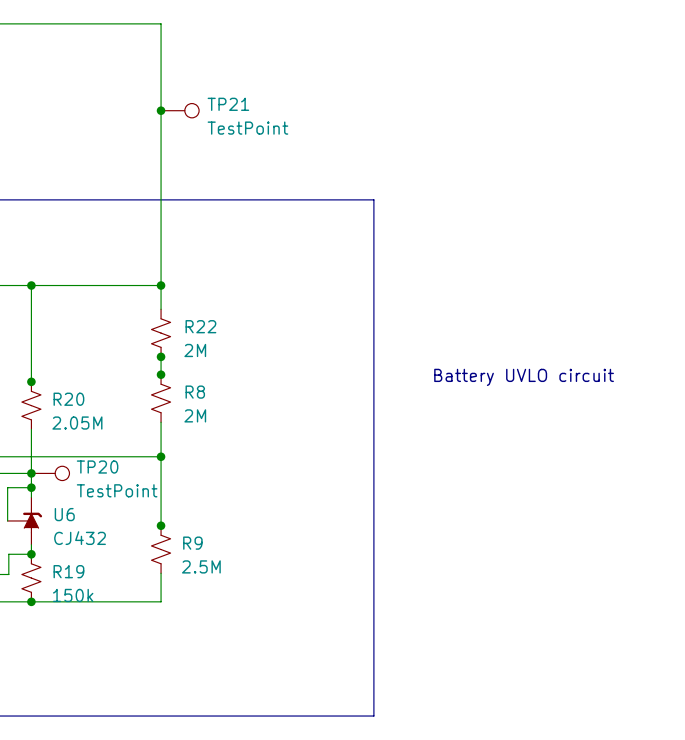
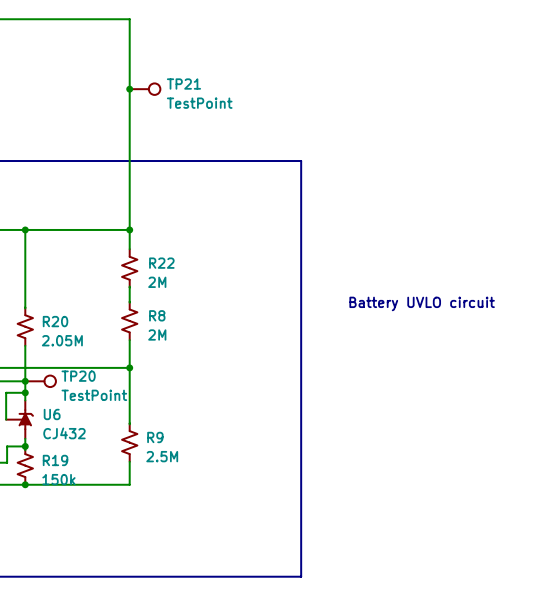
junction: (161, 356) -> none
junction: (161, 374) -> none
junction: (31, 381) -> none
junction: (161, 525) -> none

